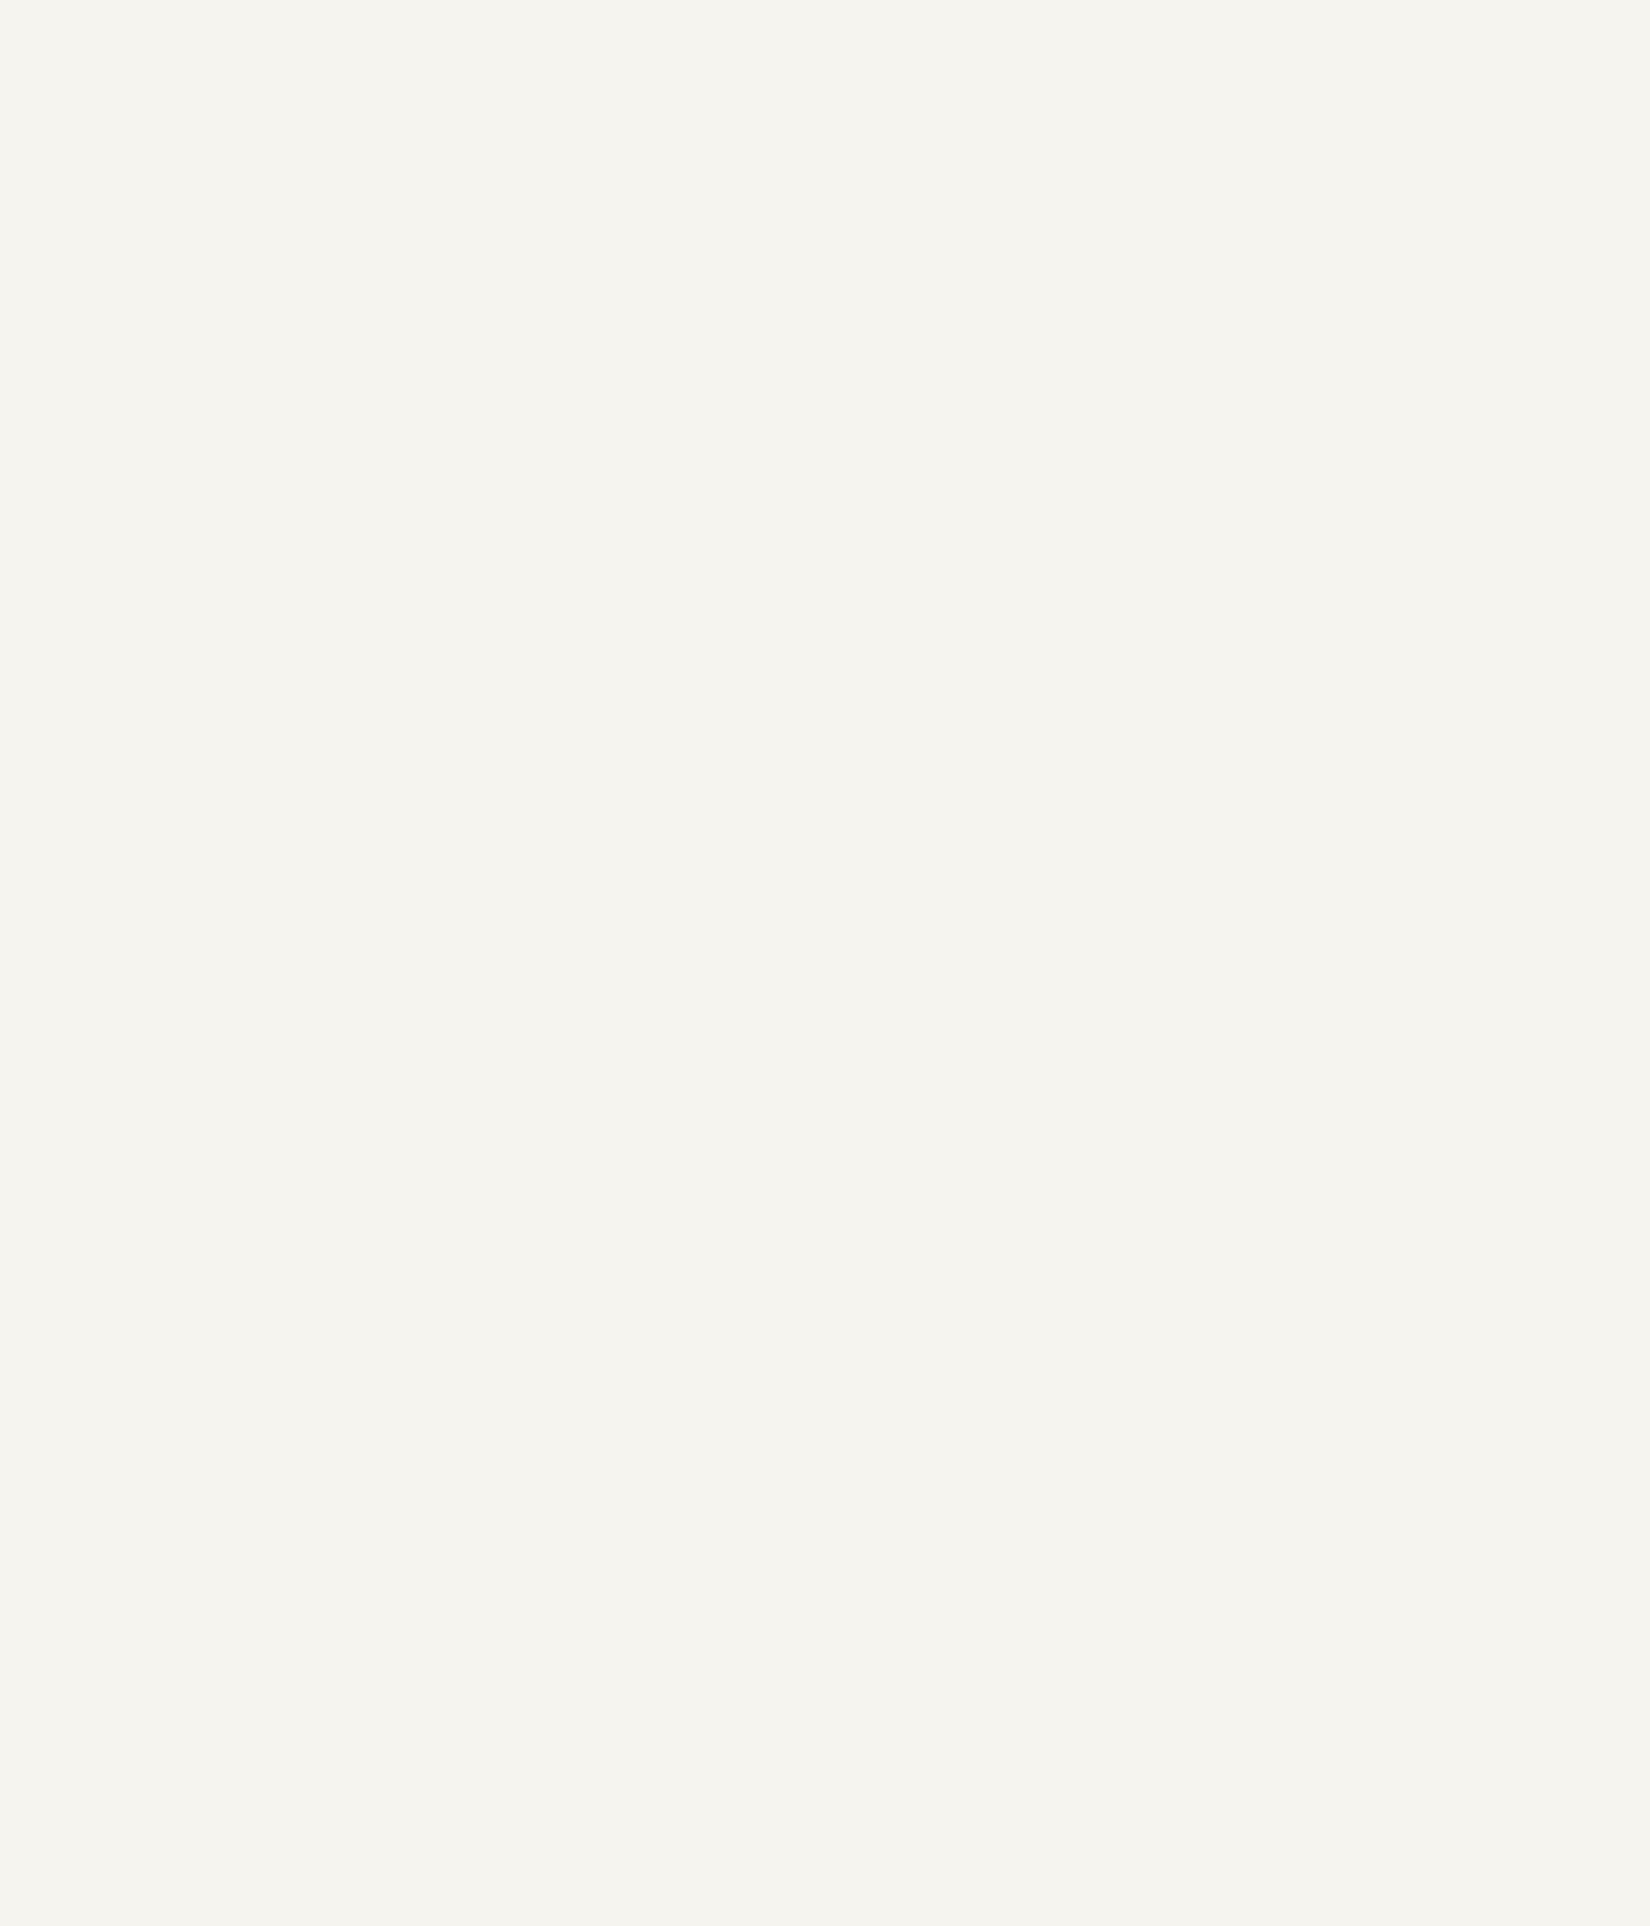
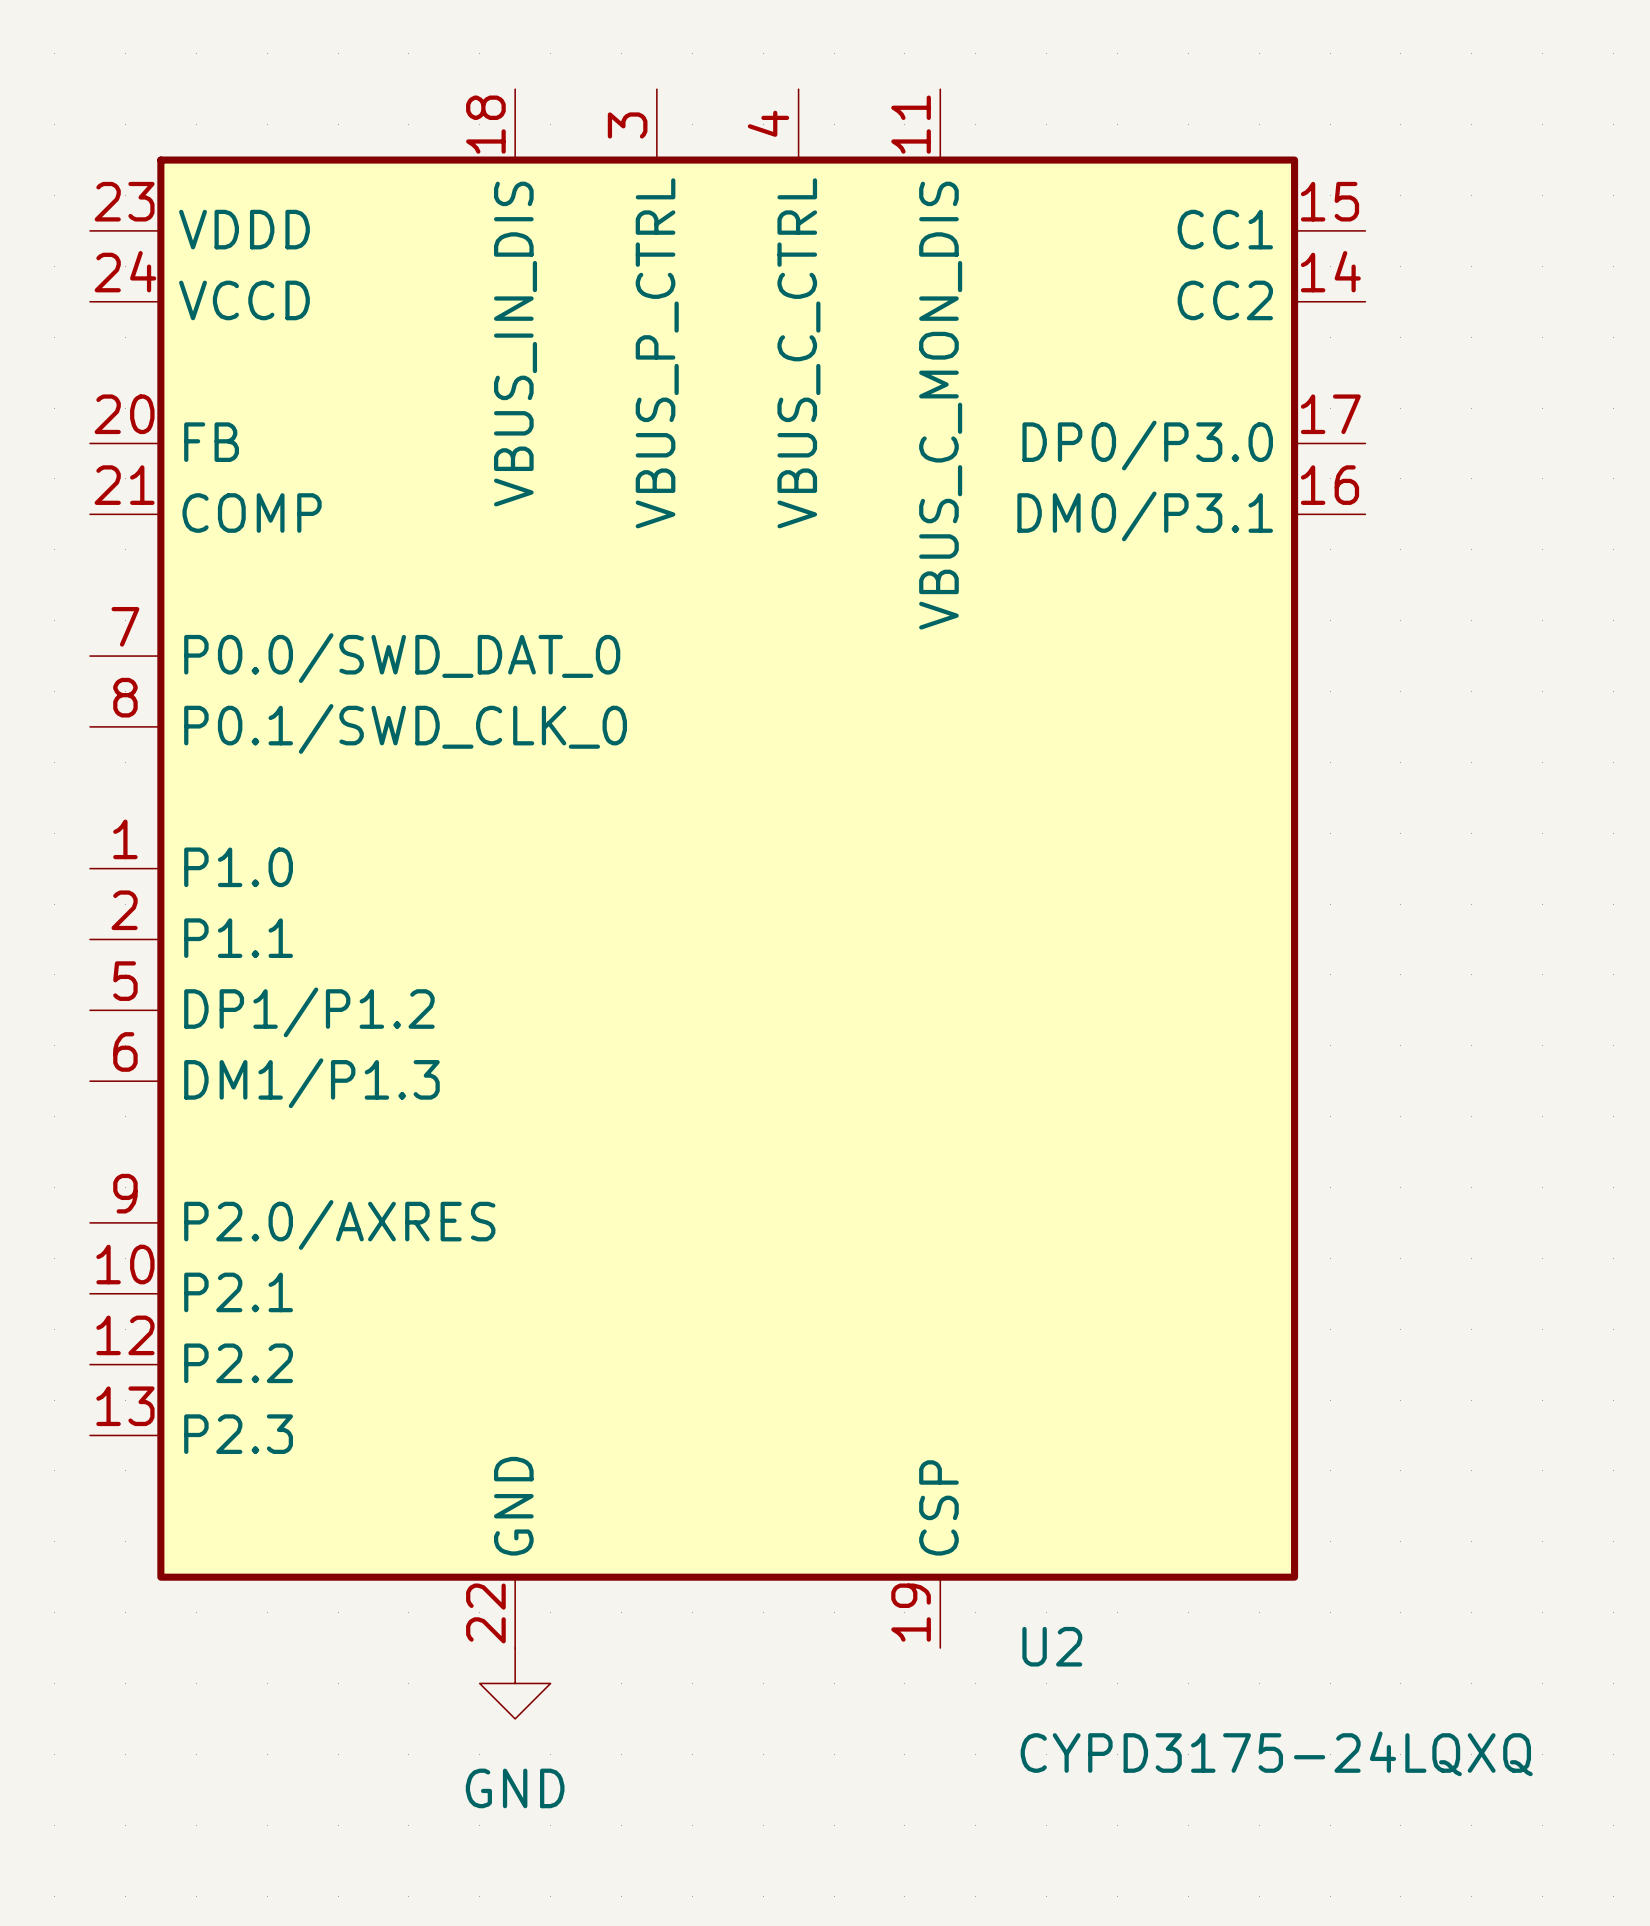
U2: none -> CYPD3175-24LQXQ (727, 868)
power symbol: none -> GND (515, 1683)

